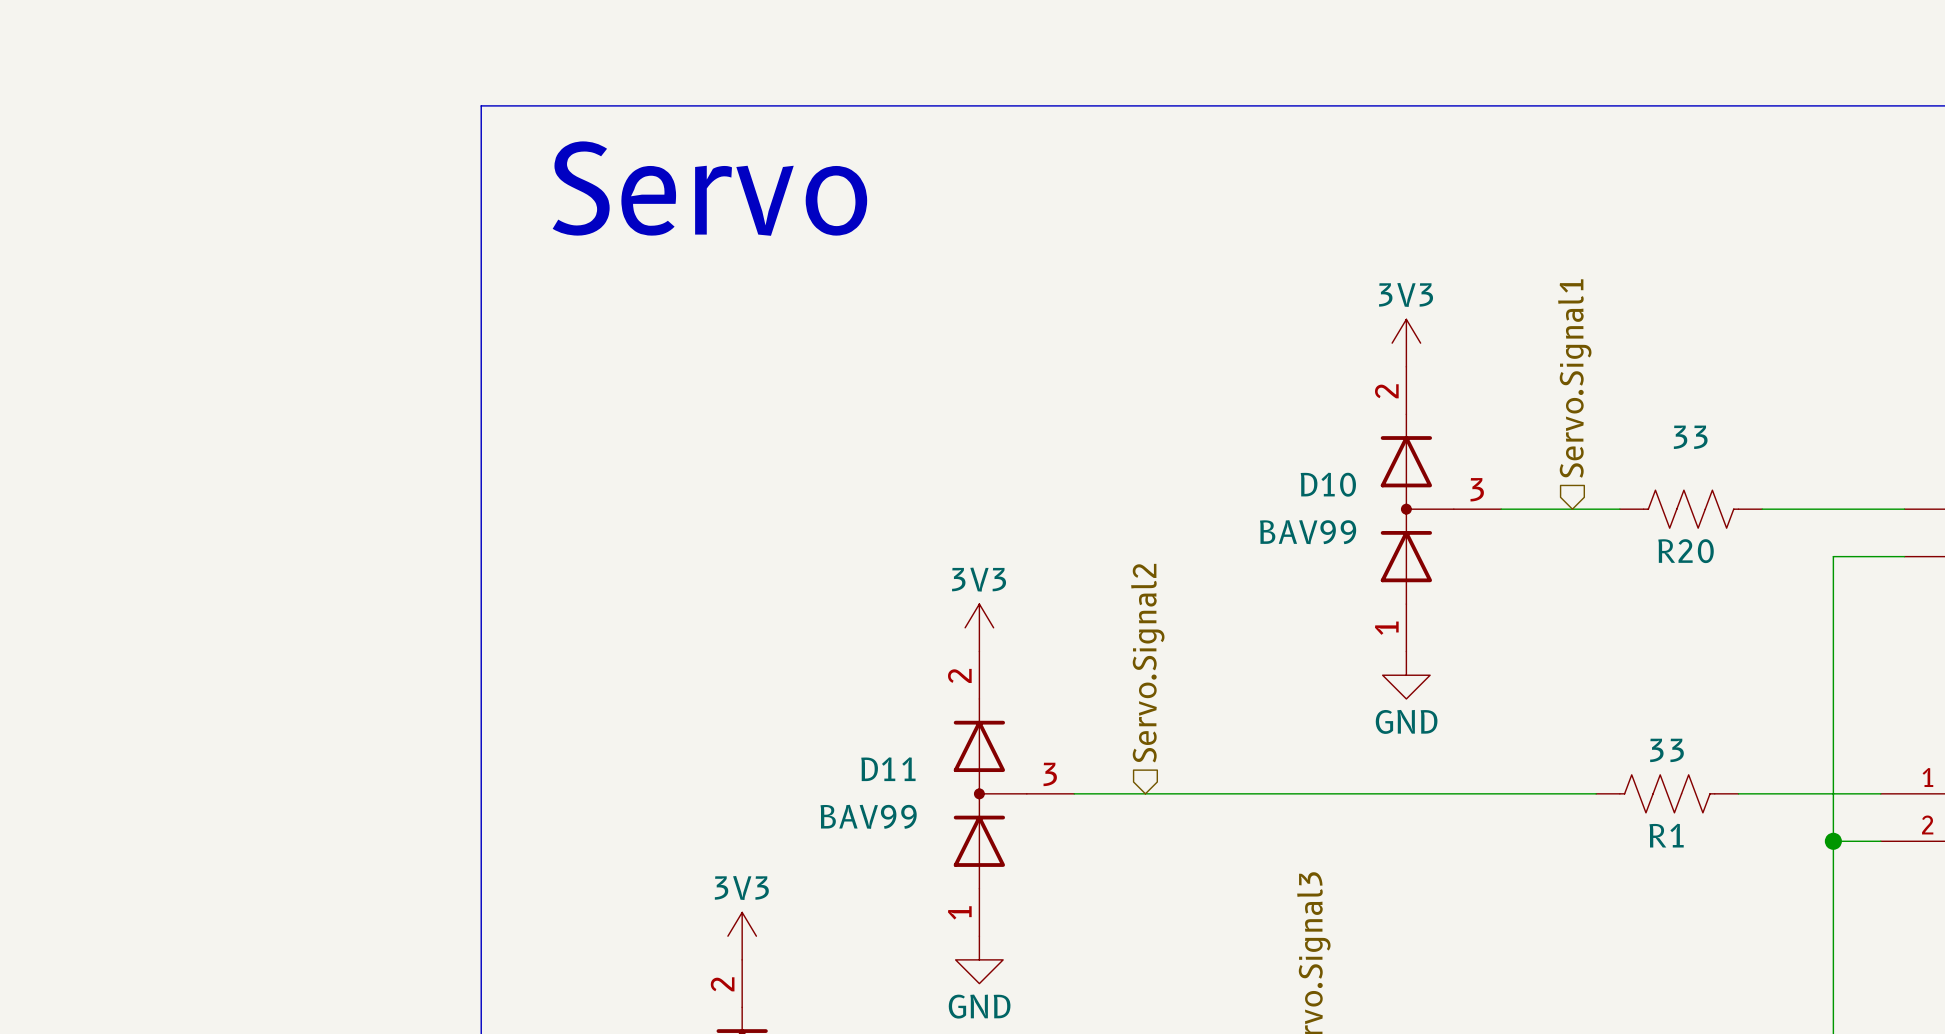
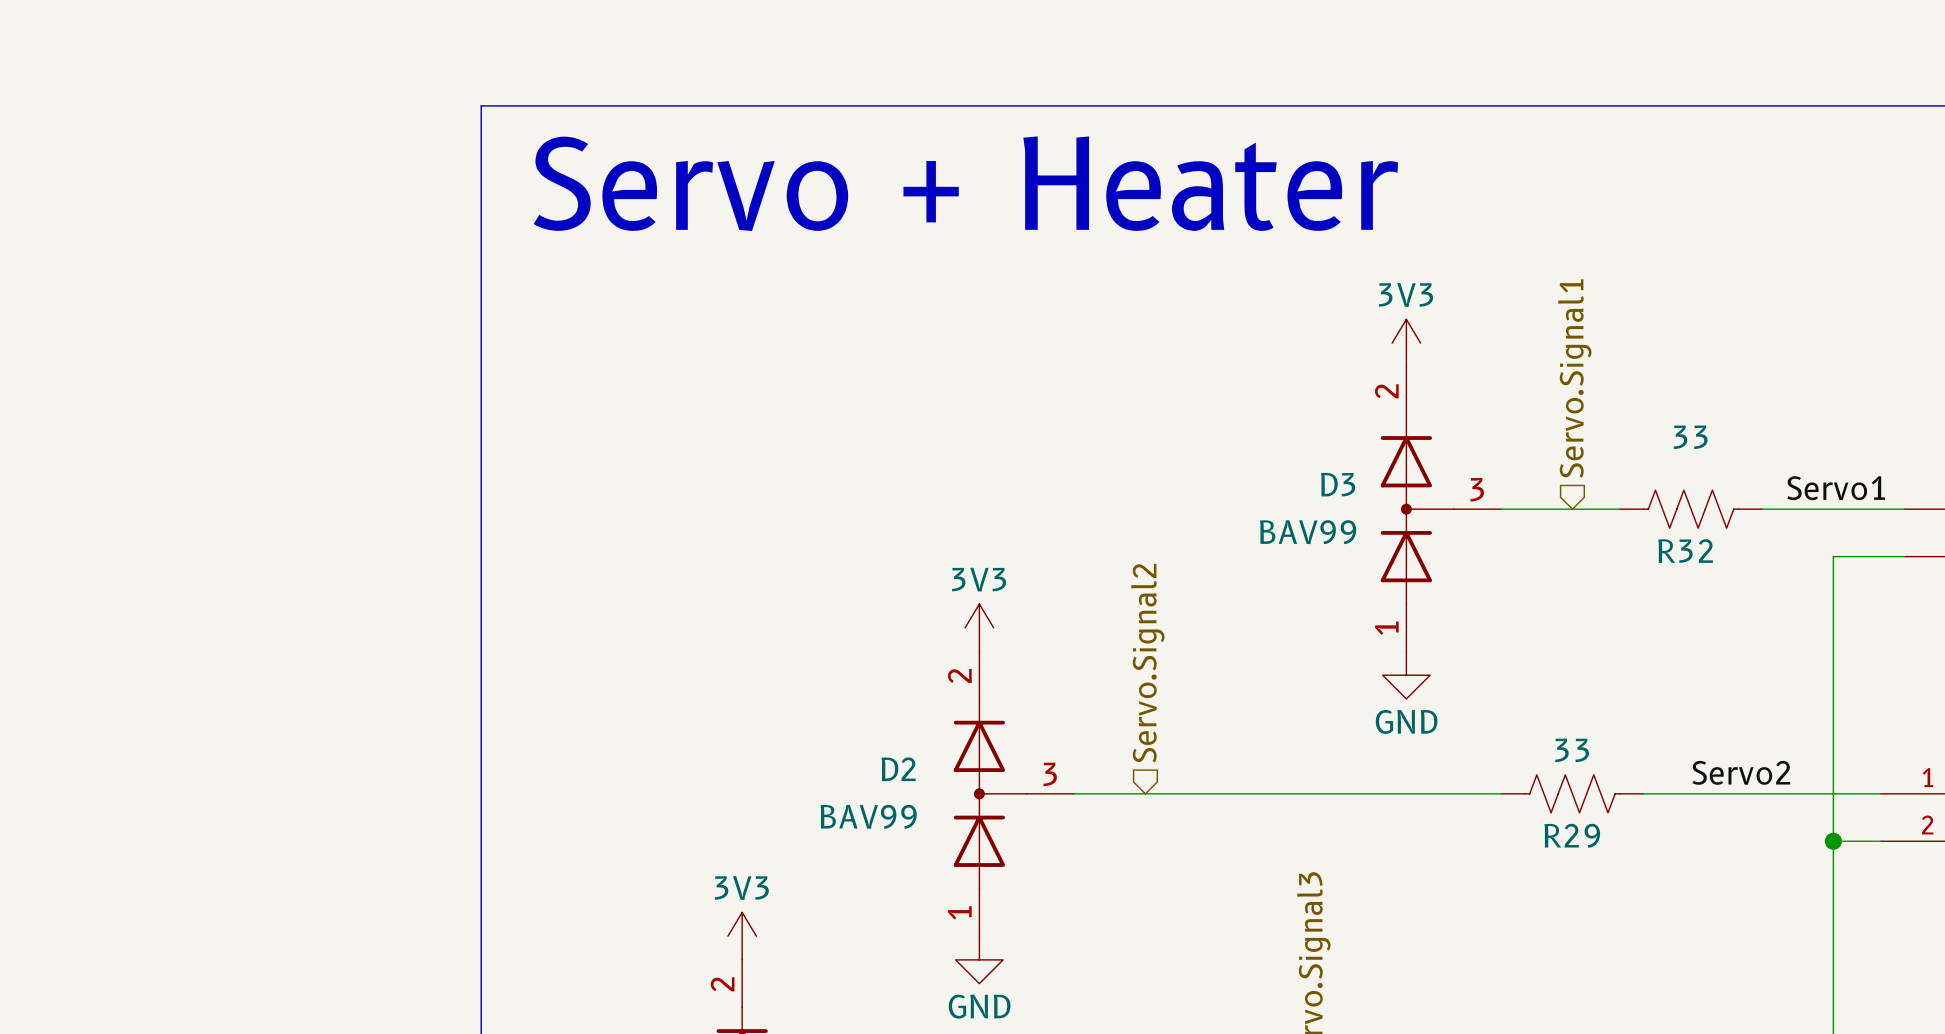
text: none -> Servo + Heater (965, 183)
text: Servo (709, 188) -> none
D10 name: D10 (1328, 484) -> D3 (1338, 484)
label: none -> Servo1 (1836, 488)
R20 name: R20 (1686, 551) -> R32 (1685, 551)
D11 name: D11 (888, 769) -> D2 (898, 769)
label: none -> Servo2 (1741, 772)
wire: (1501, 793) (1596, 793) -> (1643, 793) (1738, 793)
R29: none -> 33 (1572, 793)
R1: 33 (1667, 793) -> none

